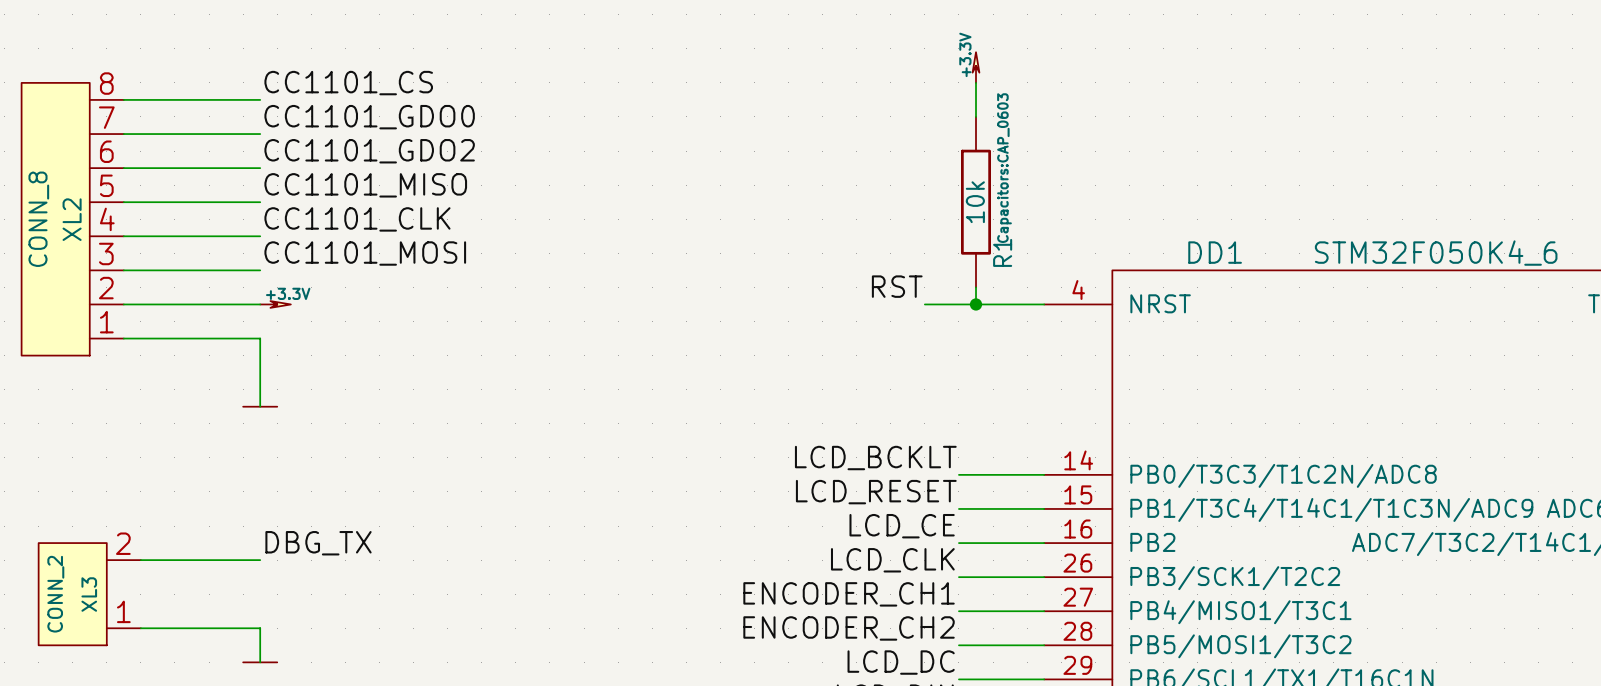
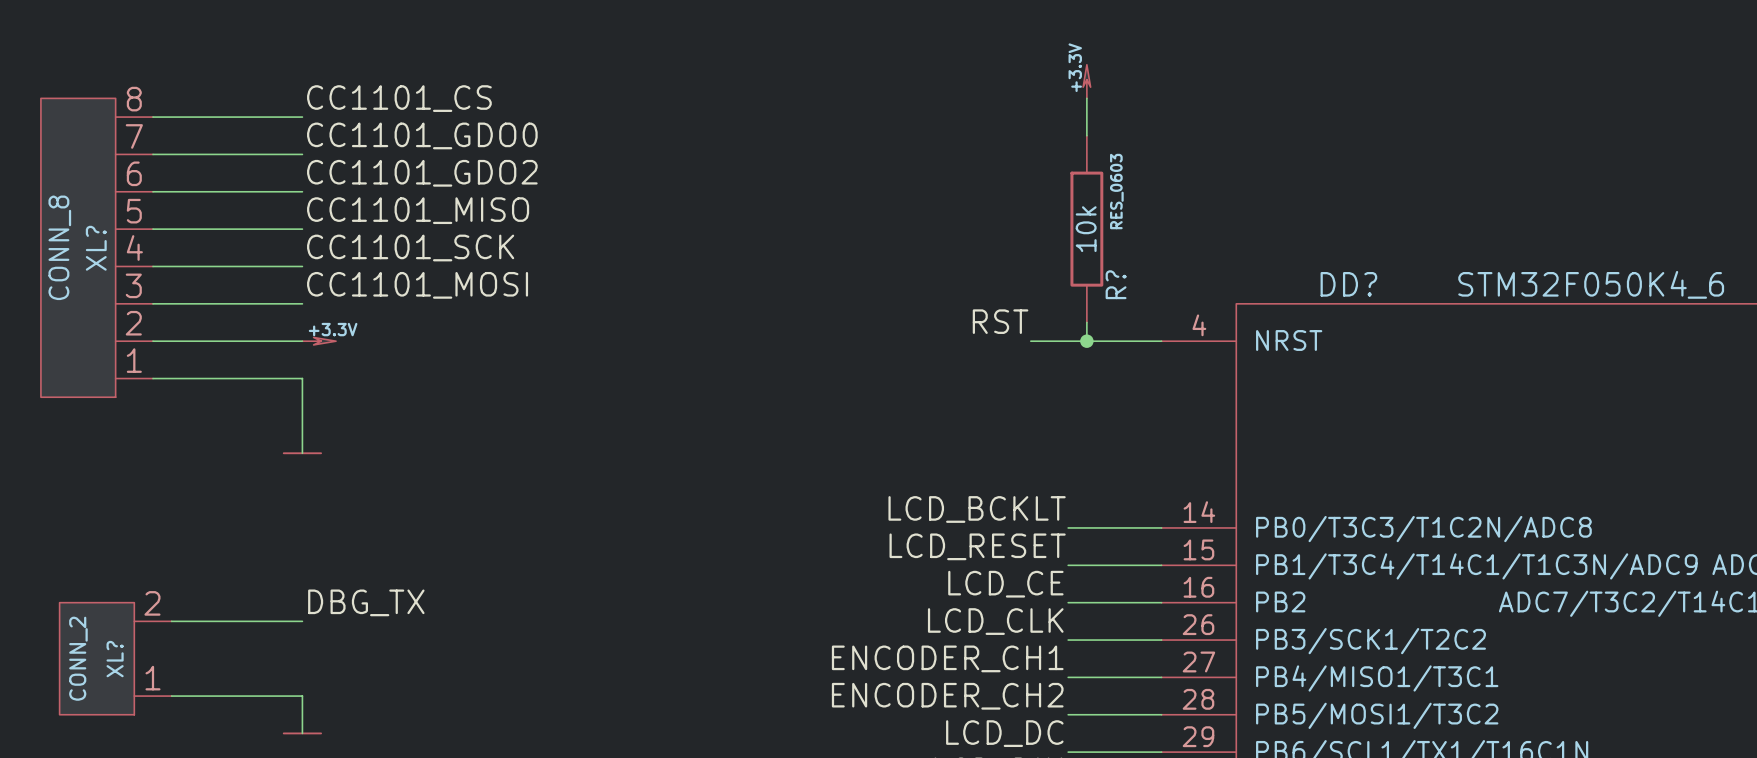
R1 text: Capacitors:CAP_0603 (1004, 168) -> RES_0603 (1116, 191)
XL2 name: XL2 (72, 219) -> XL? (96, 248)
label: CC1101_CLK (357, 219) -> СС1101_SCK (410, 248)
R1 name: R1 (1002, 252) -> R? (1116, 284)
DD1 name: DD1 (1215, 252) -> DD? (1348, 284)
XL3 name: XL3 (89, 594) -> XL? (115, 659)

